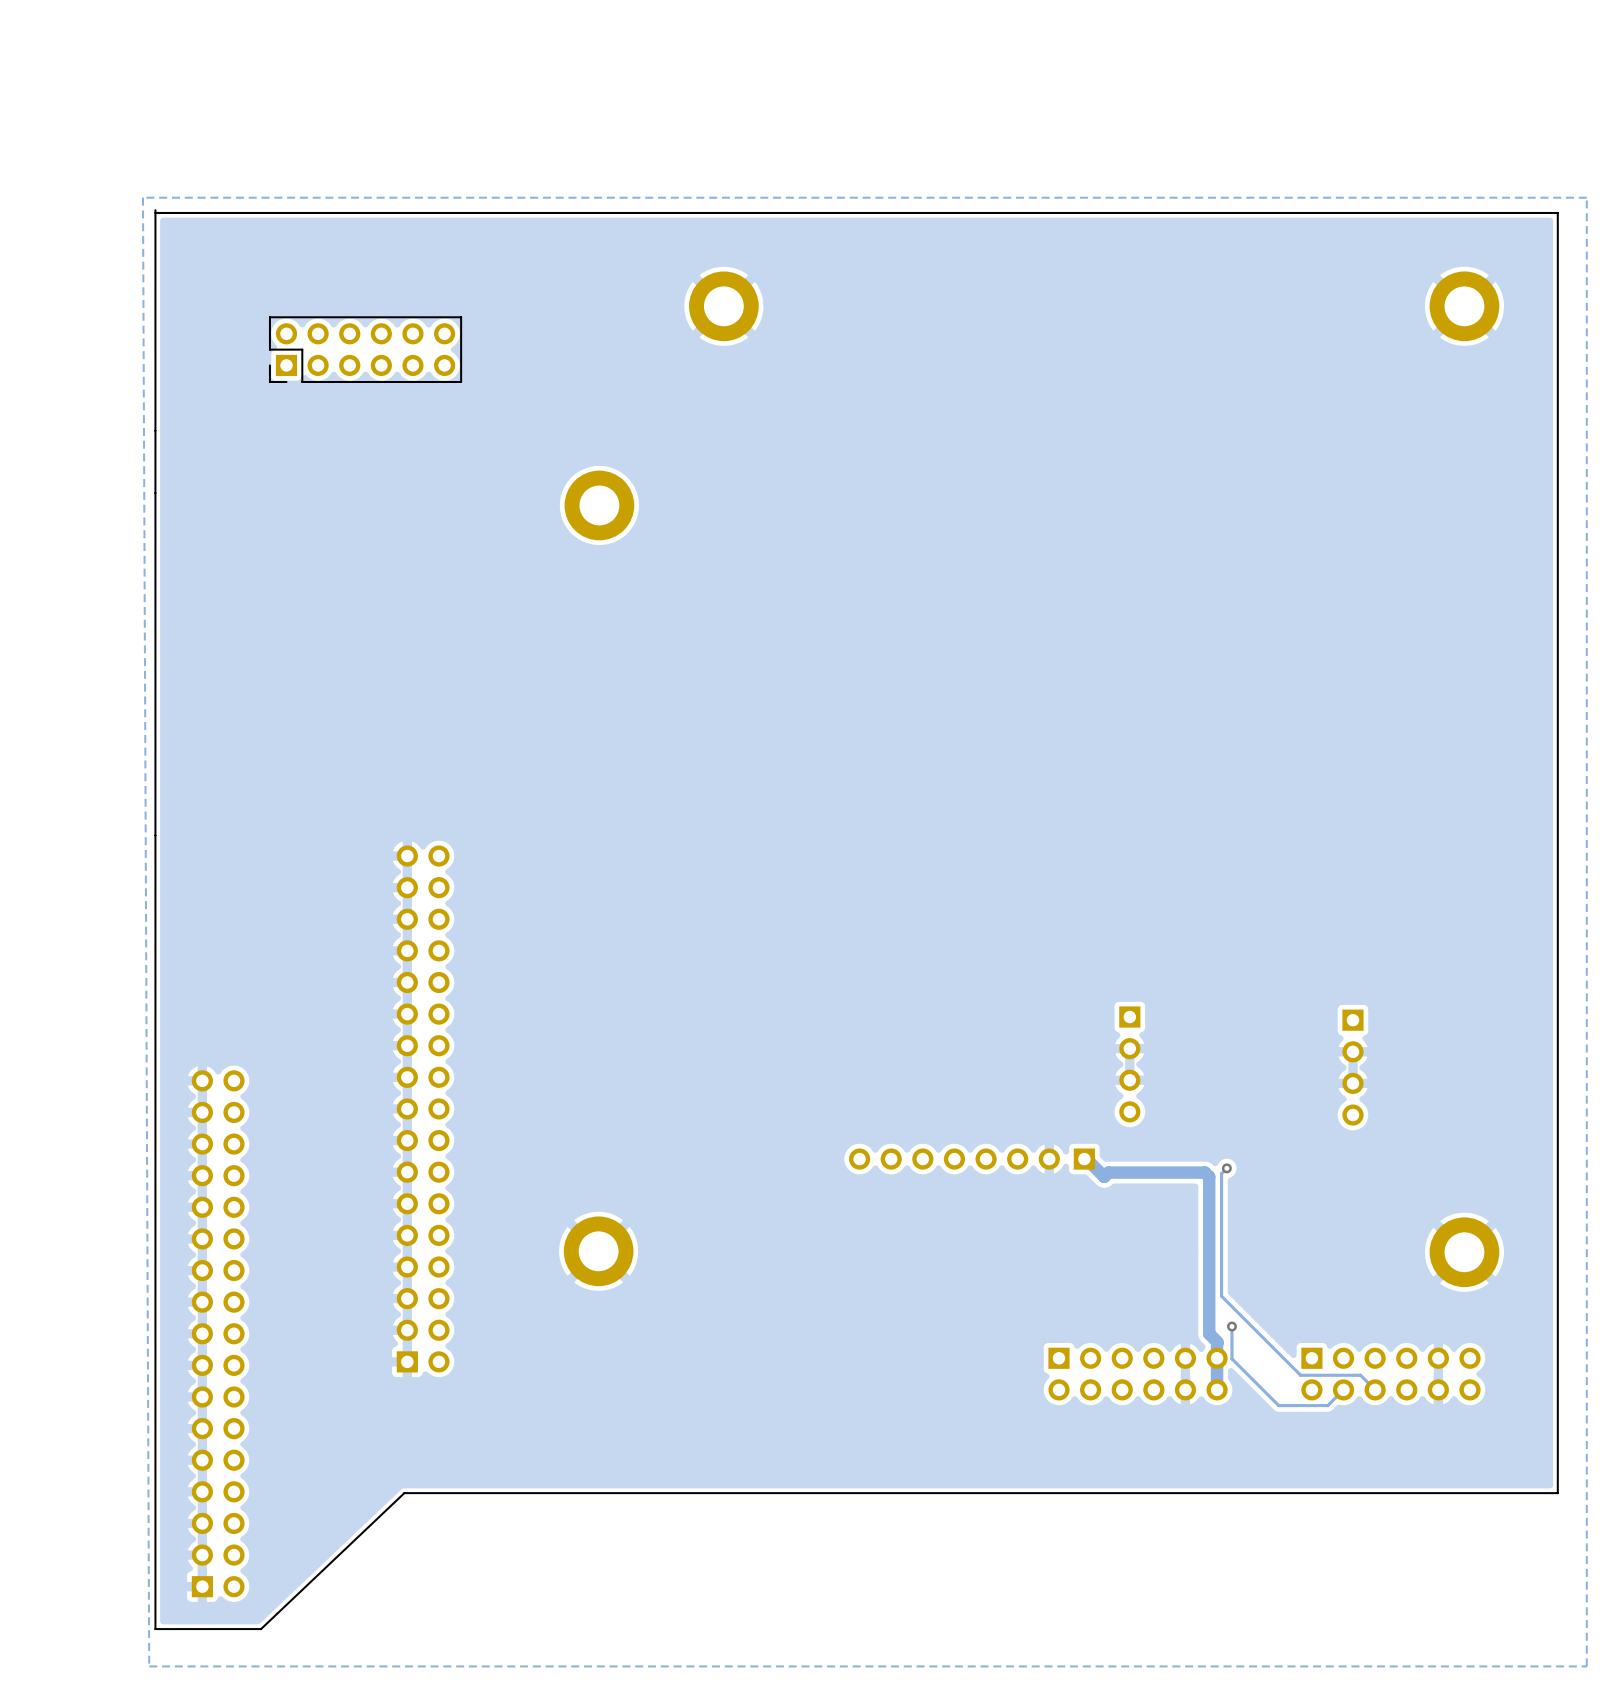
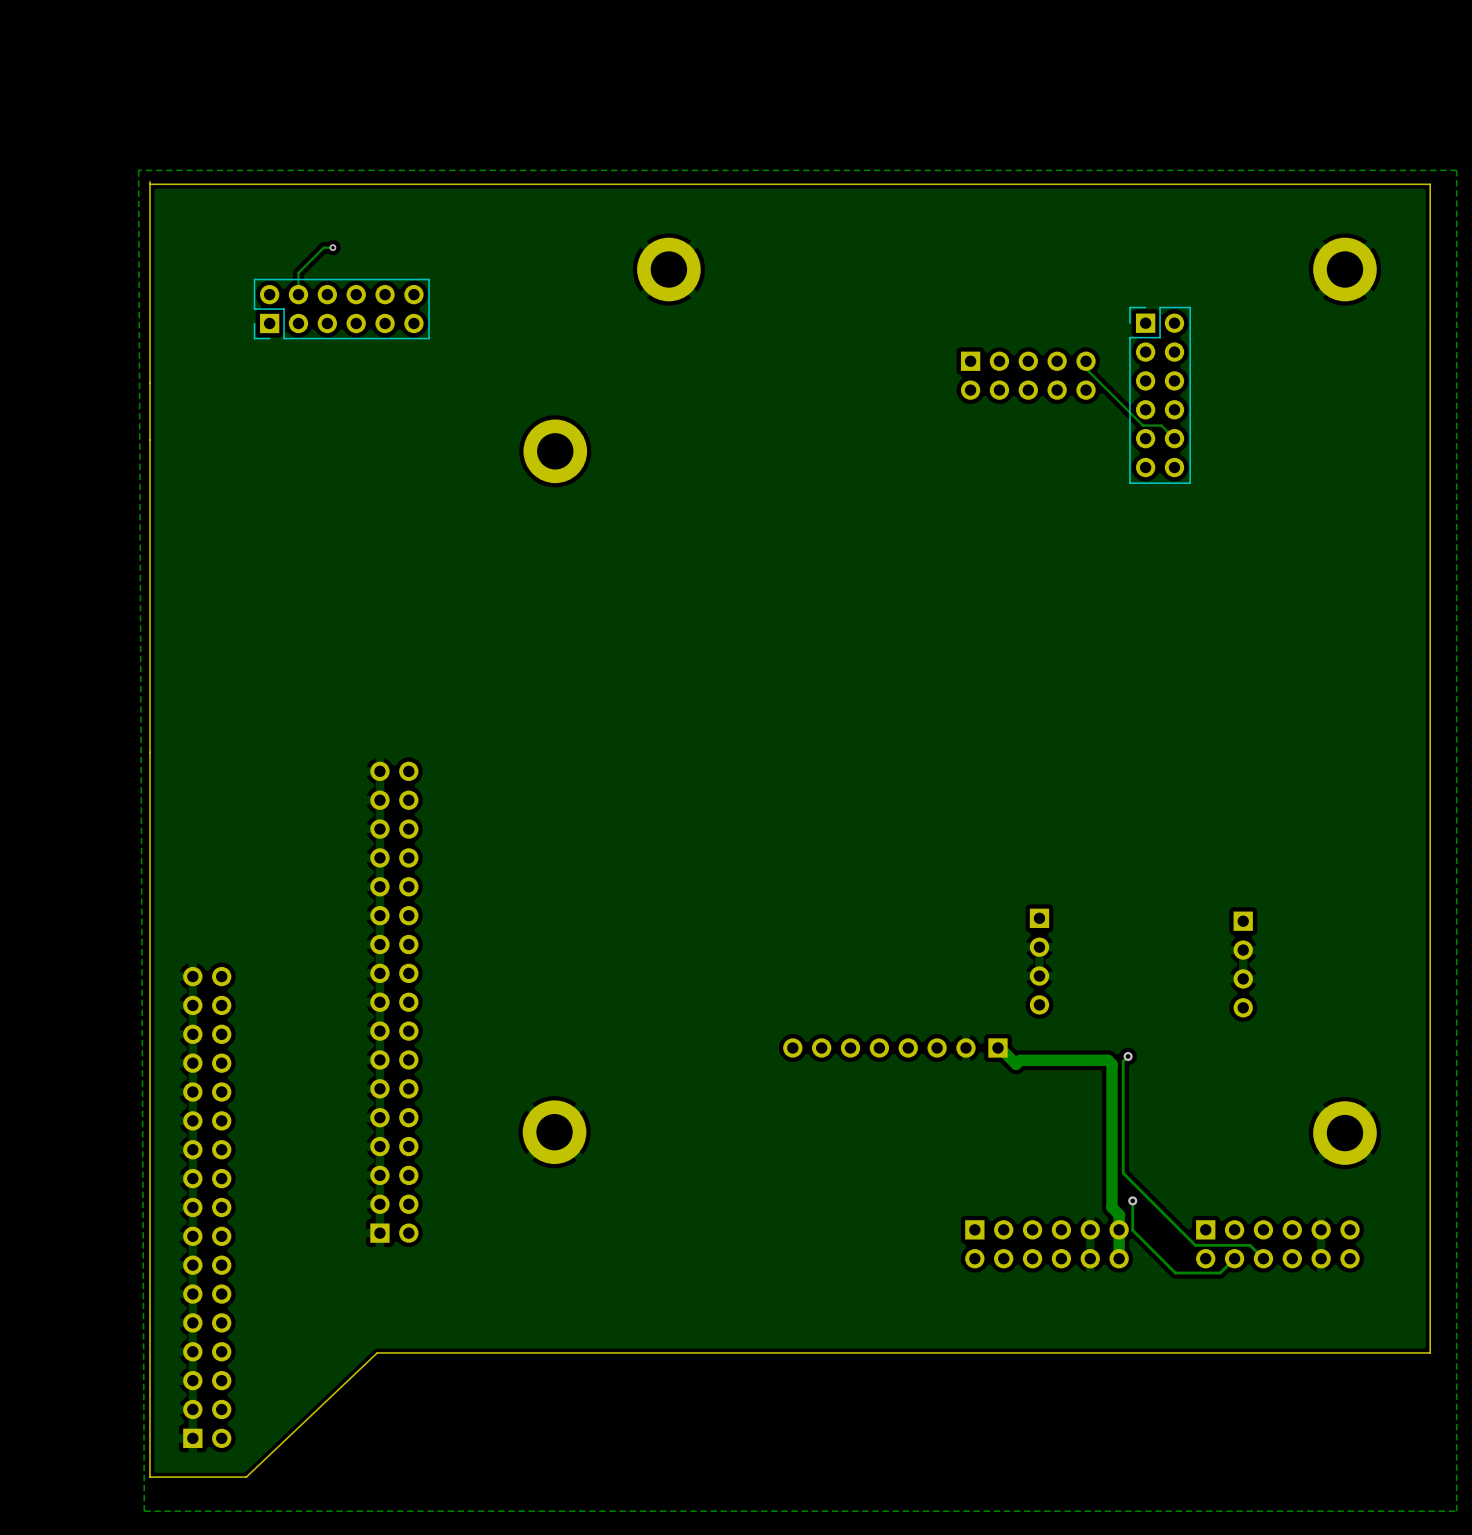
track: none -> (332, 247) (323, 247) (298, 272) (298, 294)
via: none -> (332, 247)
track: none -> (1086, 368) (1142, 425) (1161, 425) (1174, 438)
part: none -> (1028, 375)
part: none -> (1160, 395)

